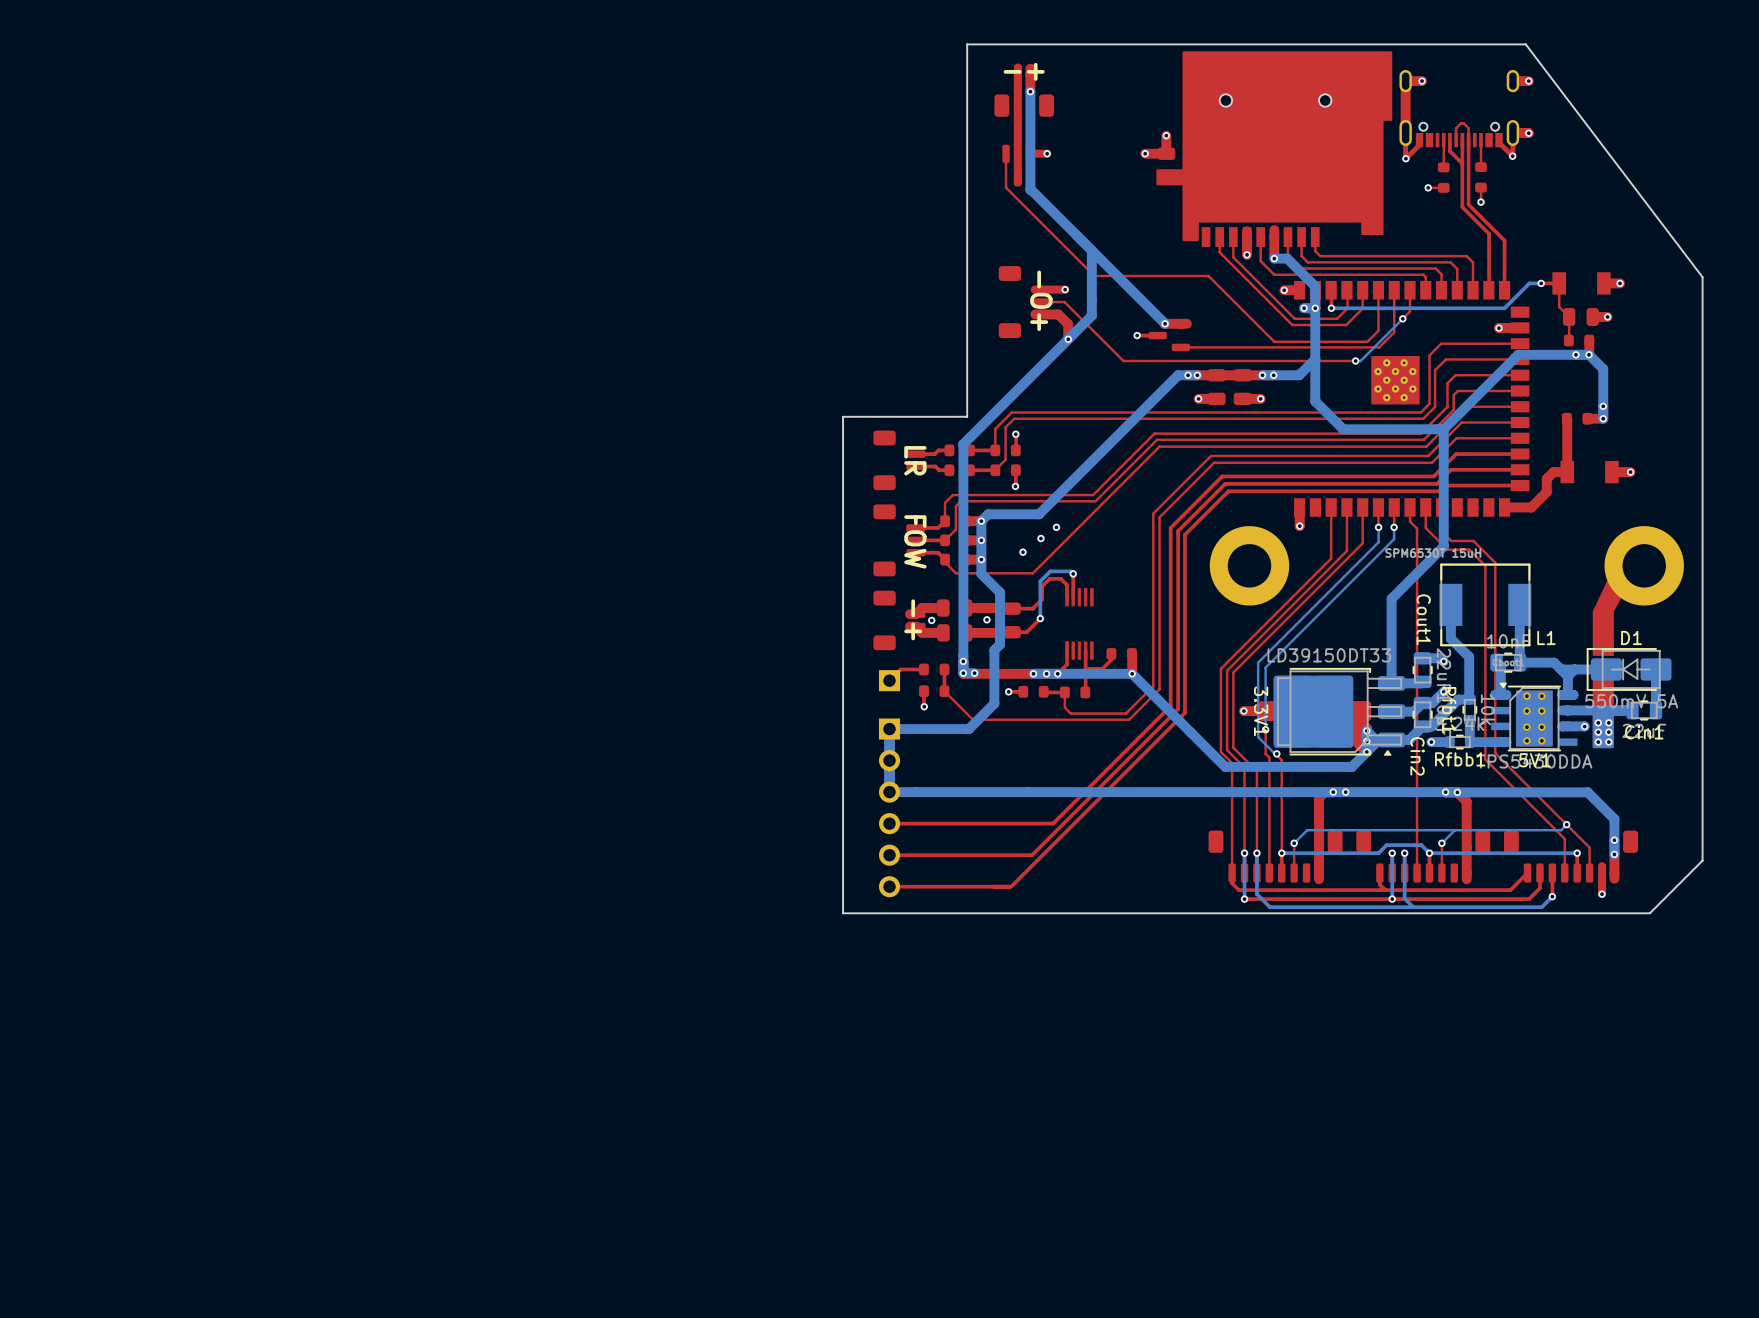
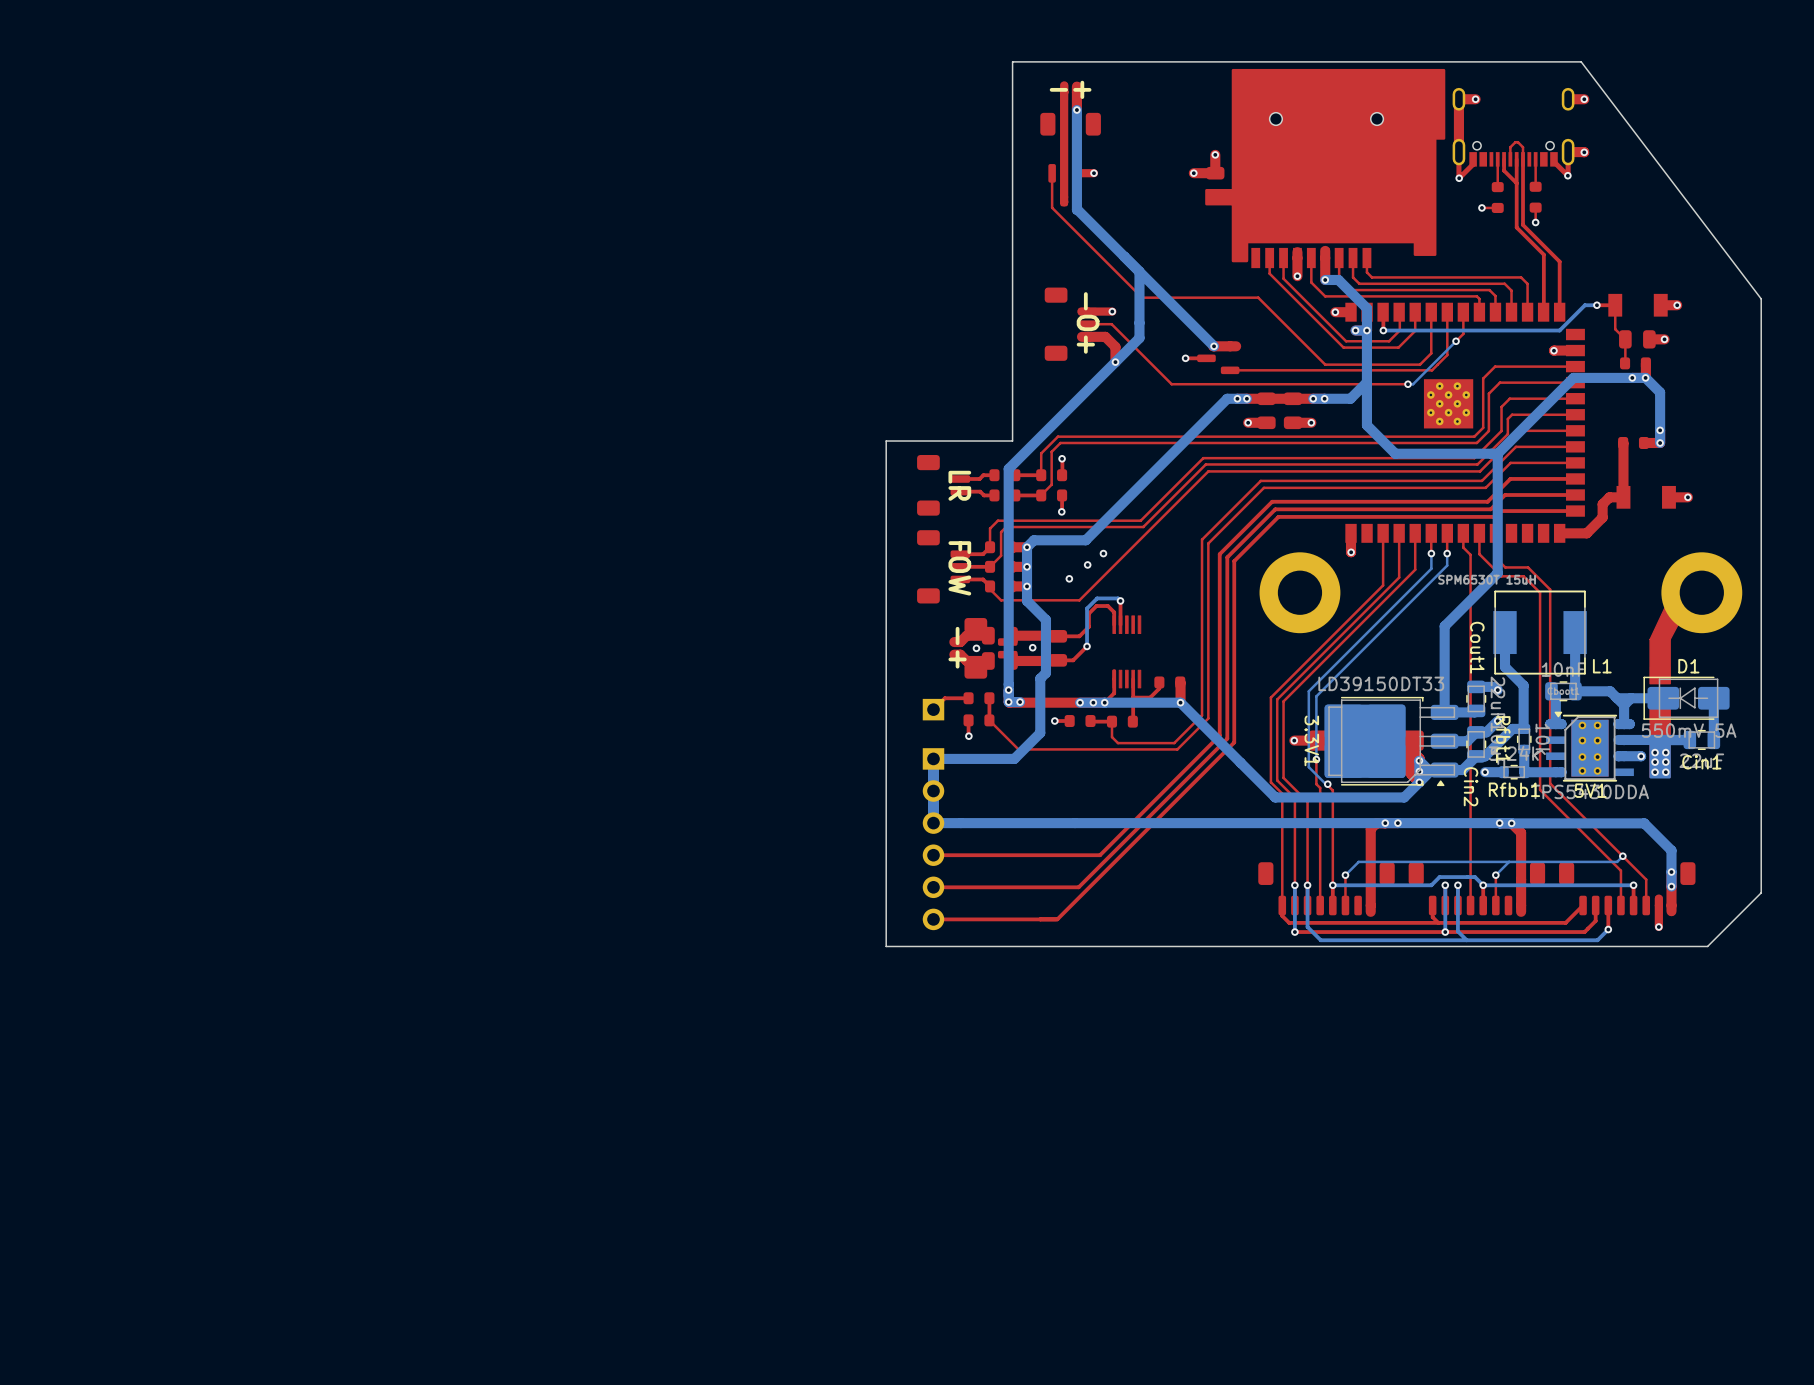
part position: (899, 620) -> (991, 648)

